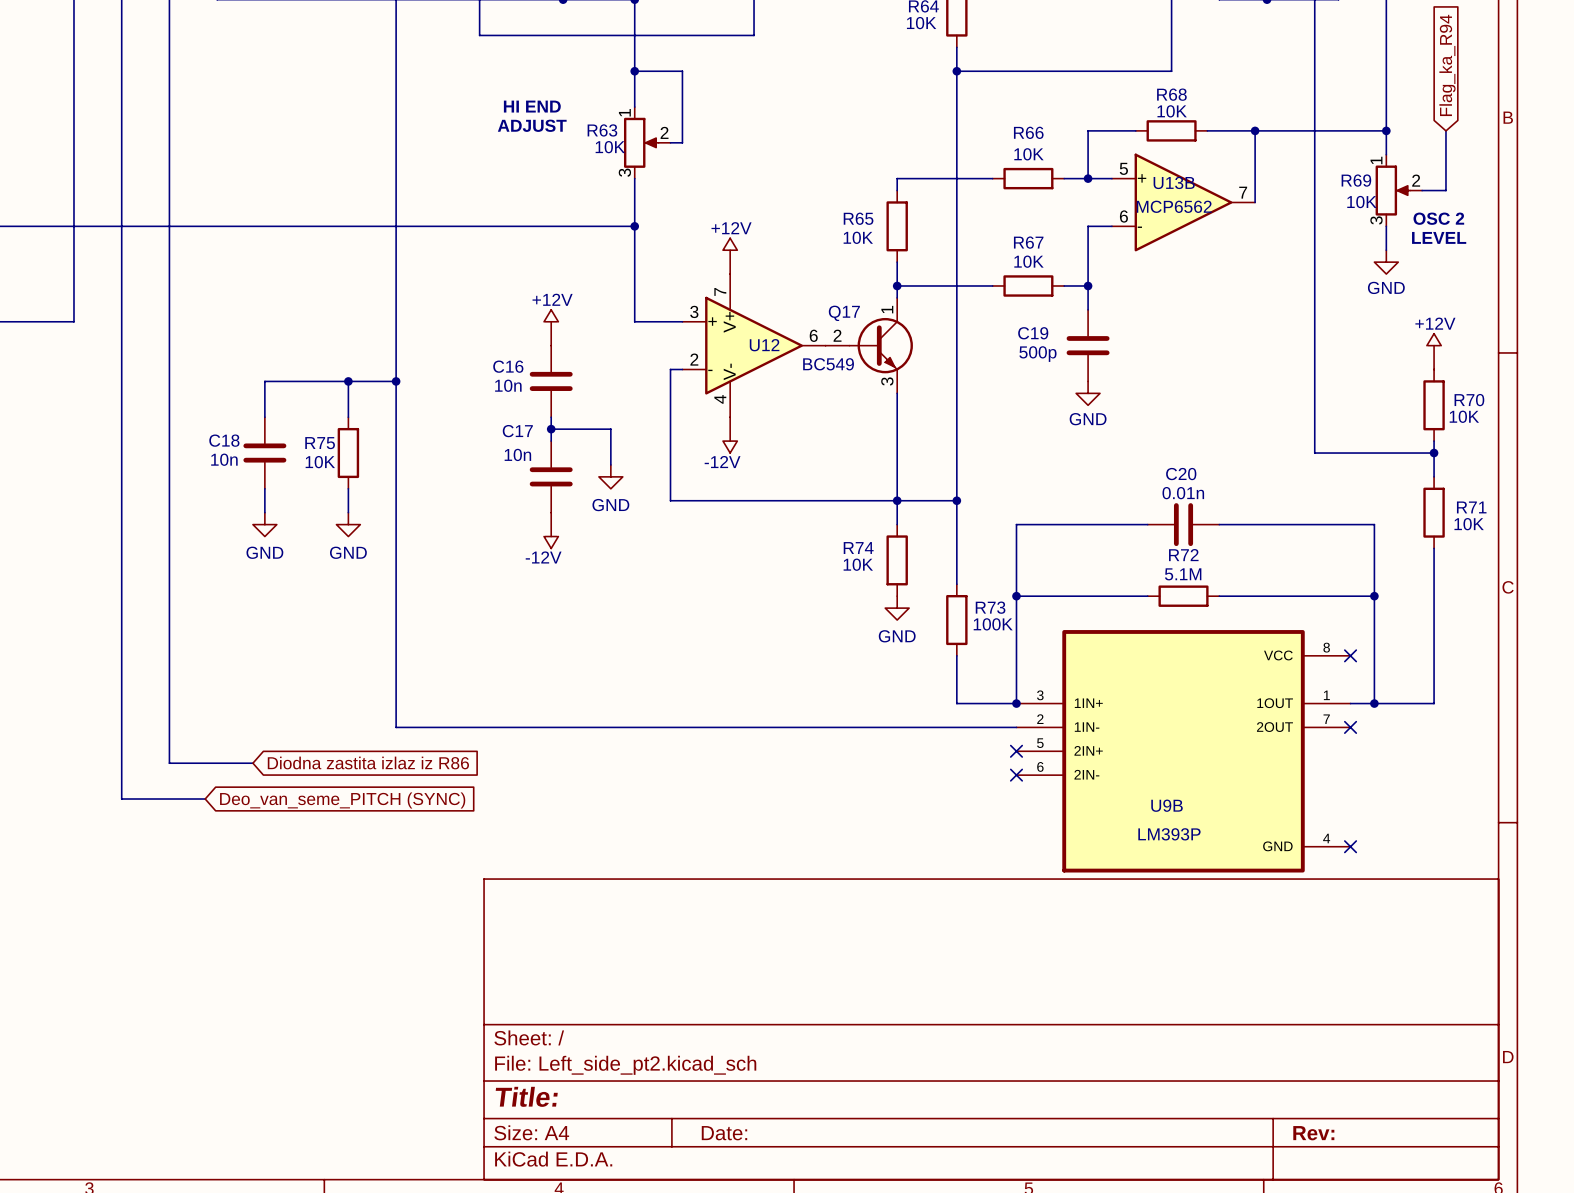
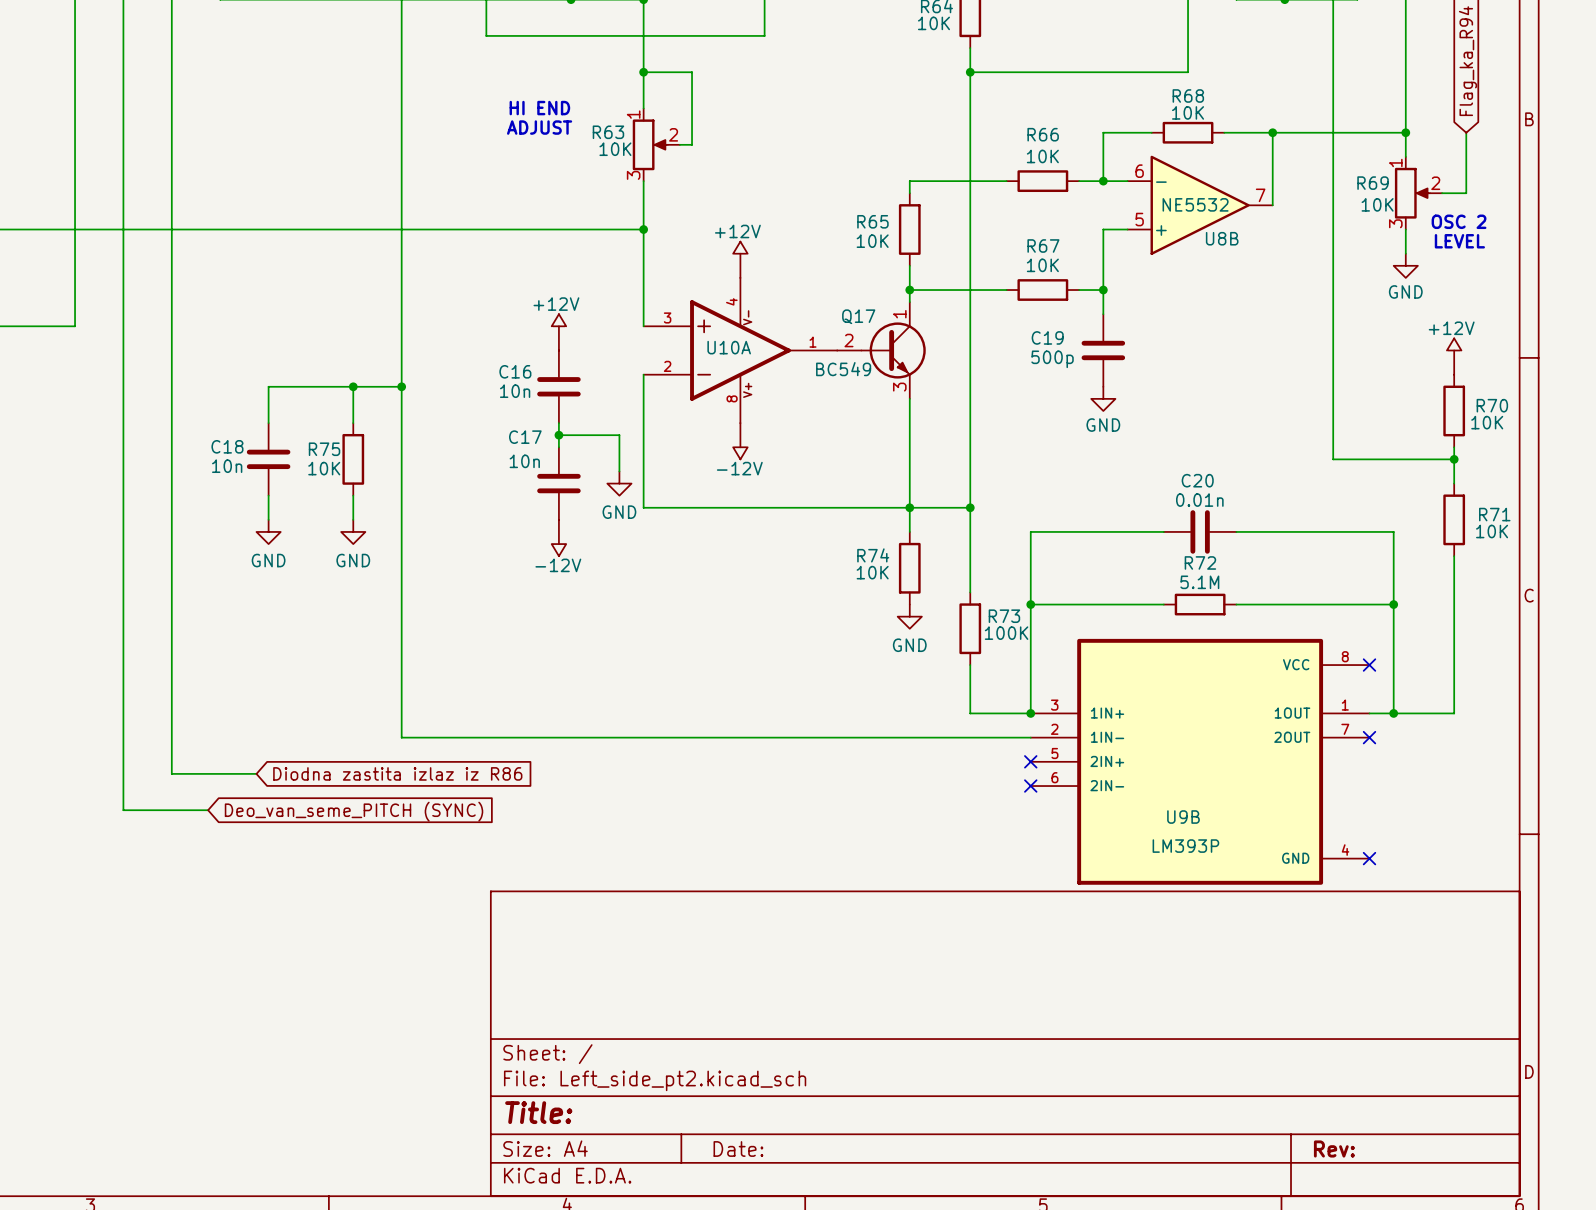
U13B name: U13B (1174, 182) -> U8B (1222, 238)
U13B flip: as is (1183, 202) -> up-down (1200, 205)
U13B value: MCP6562 (1174, 206) -> NE5532 (1195, 204)
U10A: none -> (740, 350)
U12: (754, 345) -> none
wire: (682, 369) (670, 369) (670, 500) -> (643, 374) (643, 507) (679, 507)

